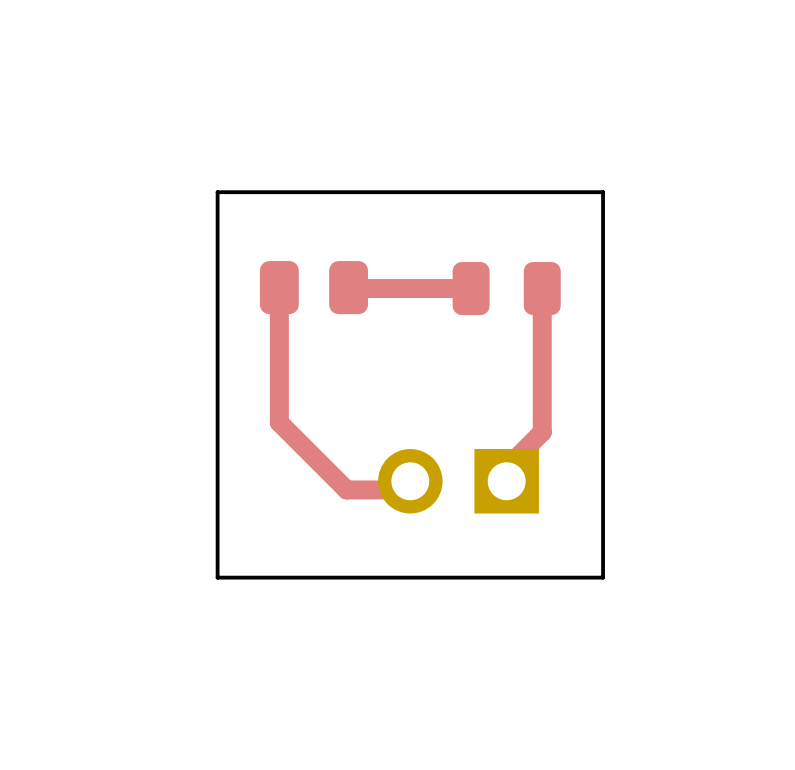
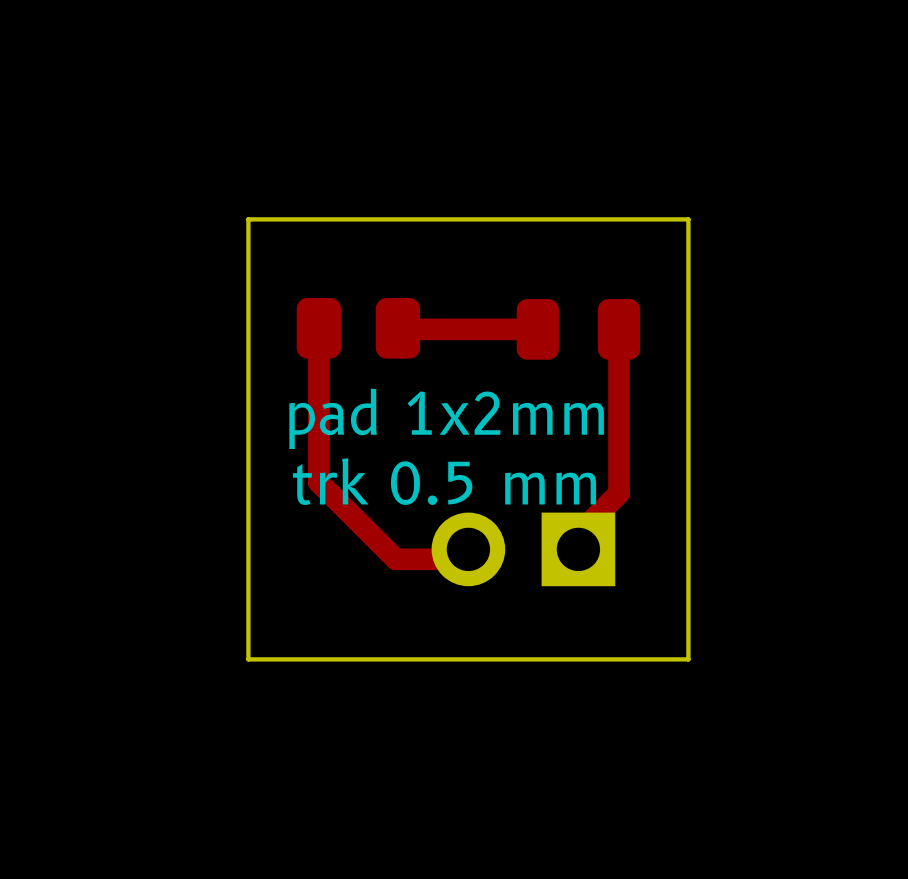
text: none -> pad 1x2mm (446, 418)
text: none -> trk 0.5 mm (444, 481)

